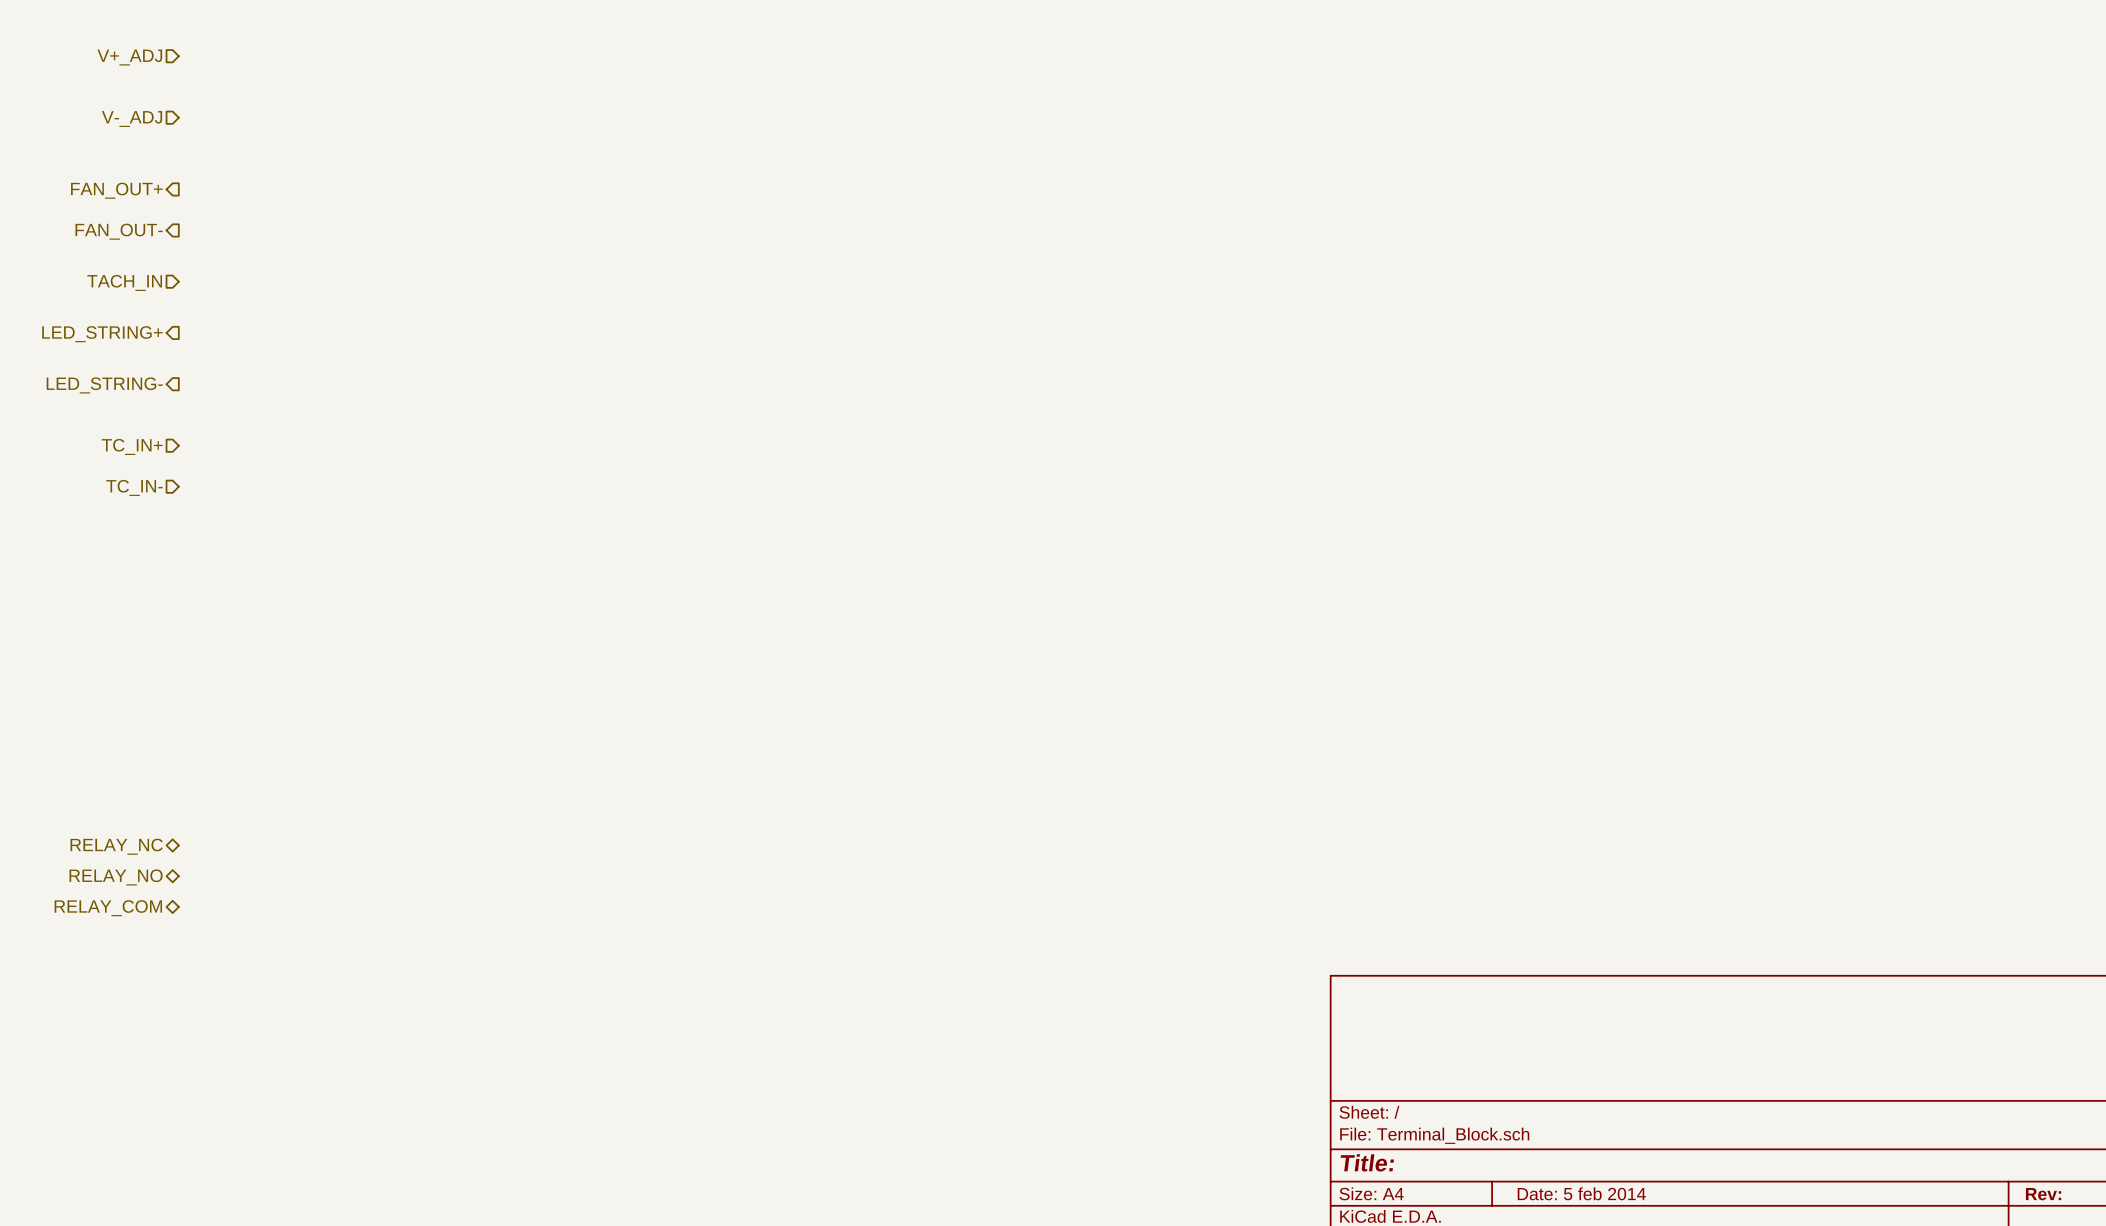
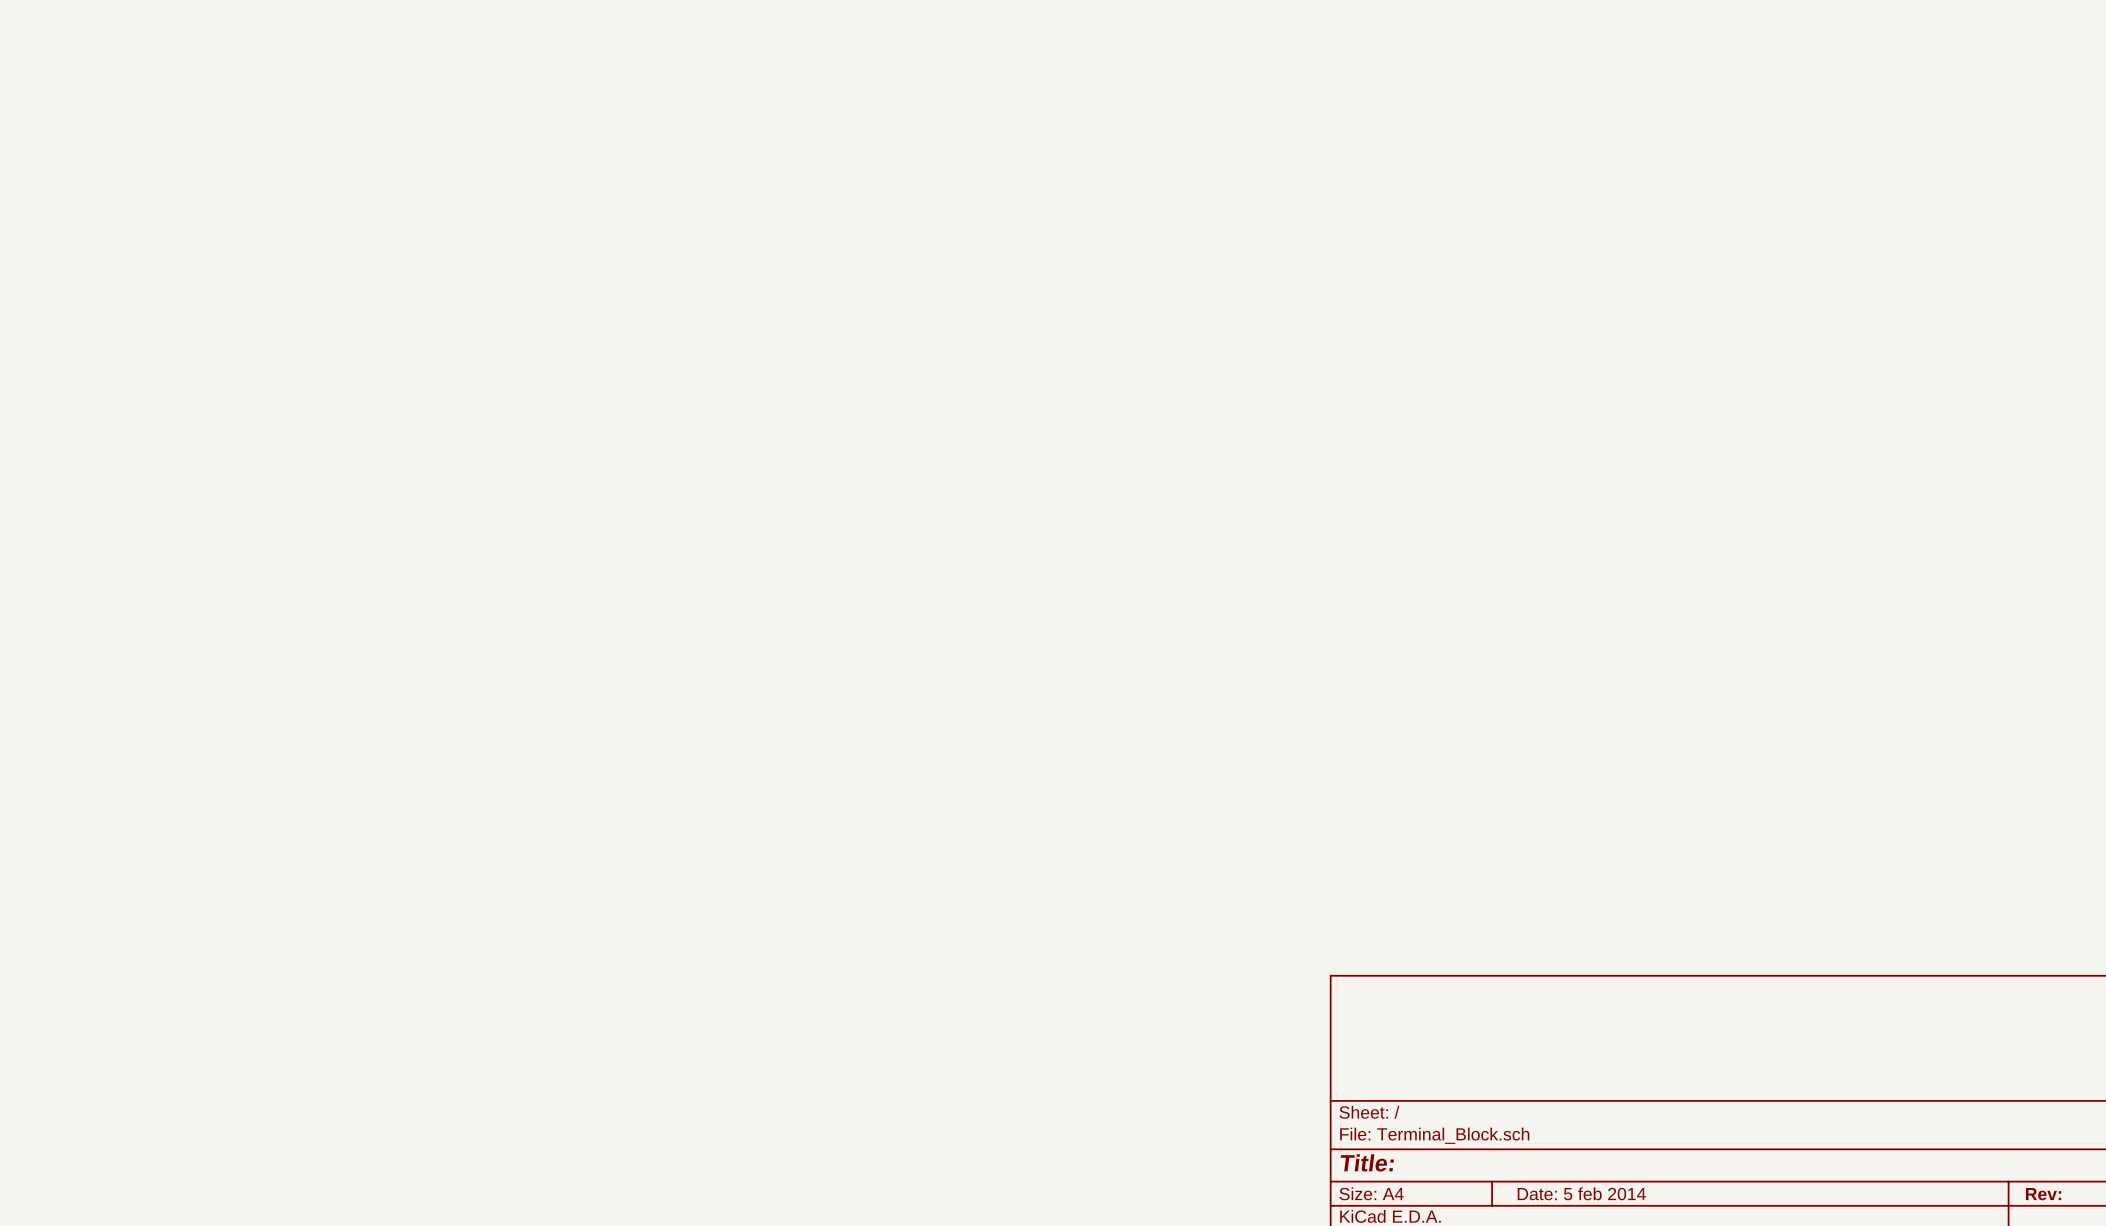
hierarchical label: V+_ADJ (129, 57) -> none
hierarchical label: V-_ADJ (132, 119) -> none
hierarchical label: FAN_OUT+ (116, 190) -> none
hierarchical label: FAN_OUT- (119, 231) -> none
hierarchical label: TACH_IN (124, 282) -> none
hierarchical label: LED_STRING+ (102, 334) -> none
hierarchical label: LED_STRING- (104, 385) -> none
hierarchical label: TC_IN+ (132, 446) -> none
hierarchical label: TC_IN- (134, 487) -> none
hierarchical label: RELAY_NC (116, 846) -> none
hierarchical label: RELAY_NO (116, 877) -> none
hierarchical label: RELAY_COM (108, 908) -> none

